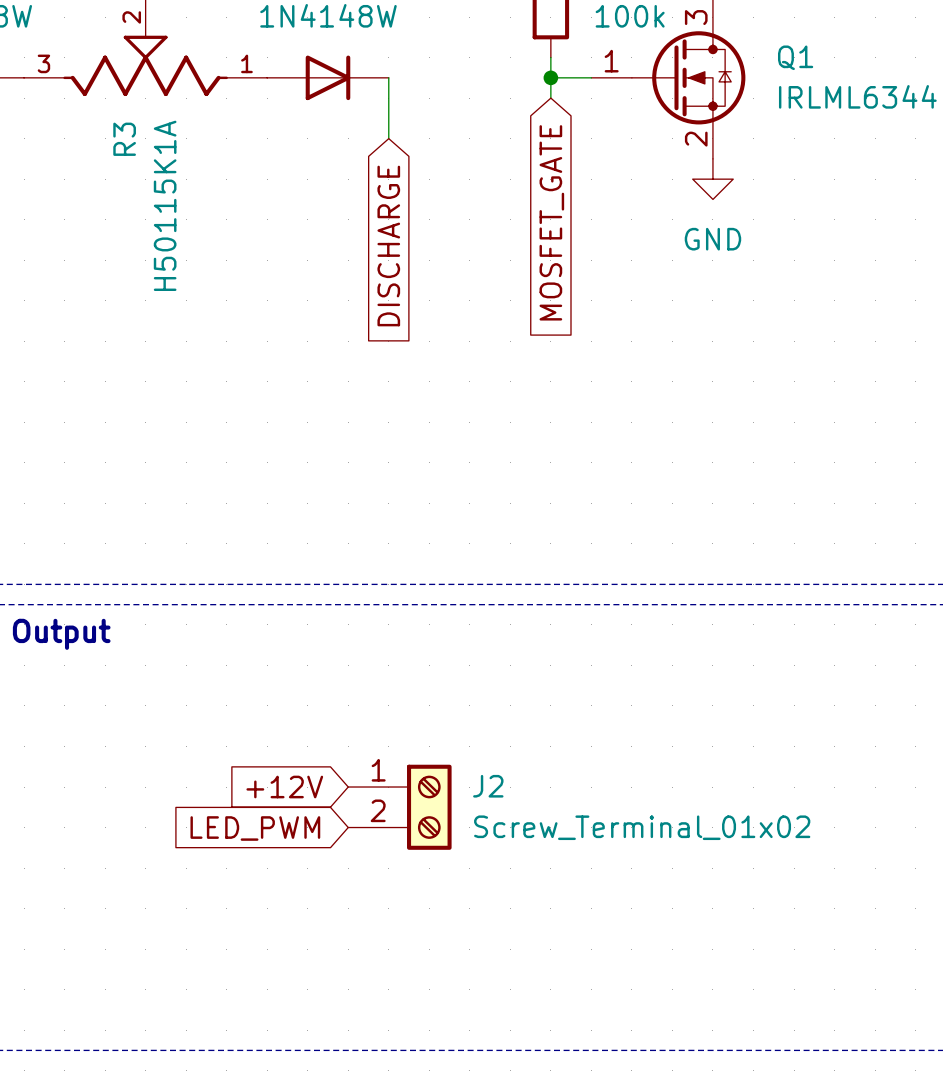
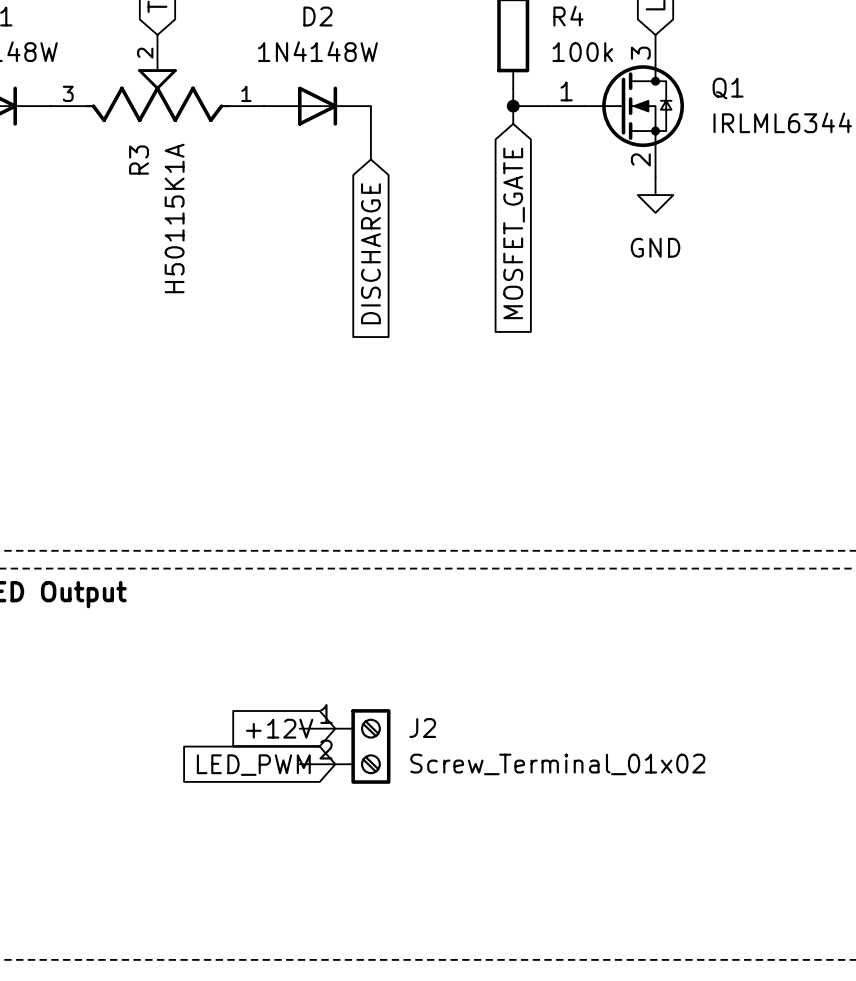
J2 position: (399, 807) -> (345, 746)

